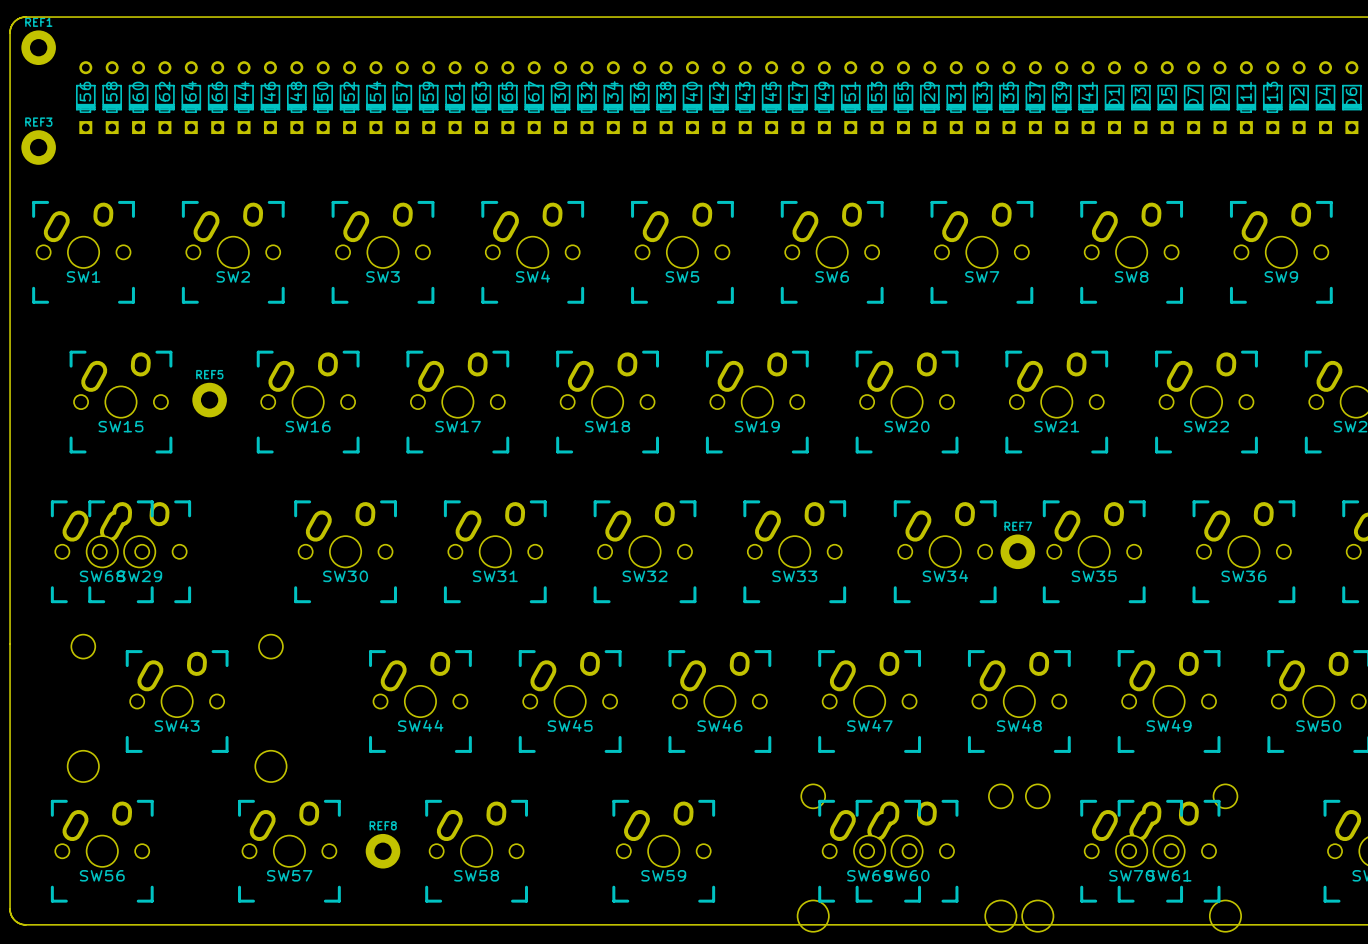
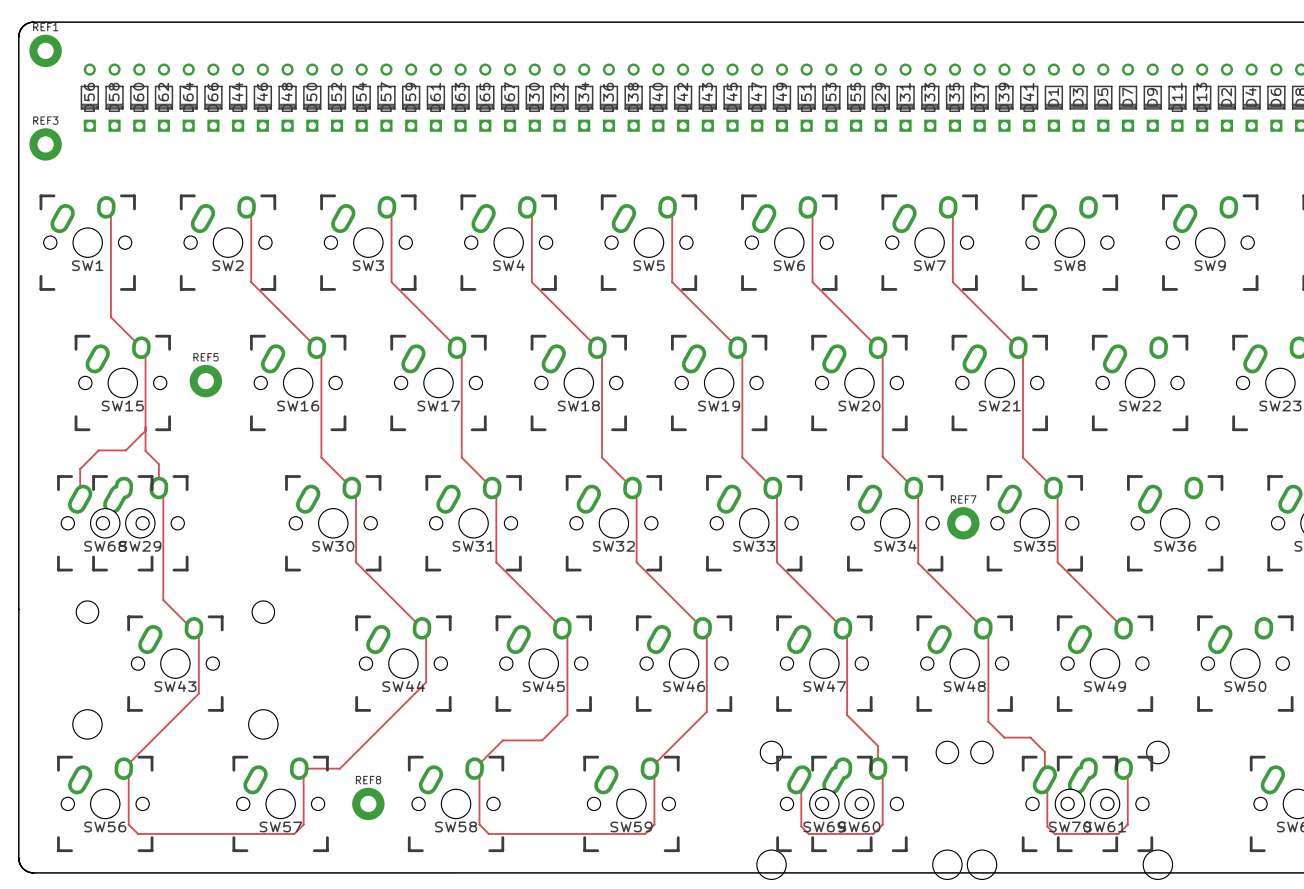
top track: none -> (106, 207) (110, 212) (110, 317) (145, 351) (145, 450) (158, 464) (158, 488) (163, 492) (163, 600) (198, 633) (198, 693) (123, 768) (128, 773) (128, 824) (138, 833) (294, 833) (303, 824) (303, 773) (299, 768) (339, 768) (426, 682) (426, 632) (356, 562) (356, 492) (321, 457) (321, 352) (251, 282) (251, 212) (246, 207)
top track: none -> (386, 207) (391, 212) (391, 282) (461, 352) (461, 457) (496, 492) (496, 562) (567, 633) (567, 715) (542, 740) (502, 740) (474, 768) (479, 773) (479, 824) (488, 833) (645, 833) (654, 824) (654, 773) (650, 768) (706, 711) (706, 632) (636, 562) (636, 492) (602, 457) (602, 352) (531, 282) (531, 212) (527, 207)
top track: none -> (667, 207) (672, 212) (672, 282) (742, 352) (742, 457) (776, 492) (776, 562) (847, 632) (847, 715) (878, 746) (878, 768) (882, 773) (882, 824) (873, 833) (808, 833) (801, 826) (801, 781) (799, 779)
top track: none -> (807, 207) (812, 212) (812, 282) (882, 352) (882, 456) (918, 492) (918, 563) (988, 633) (988, 721) (1004, 737) (1030, 737) (1044, 751) (1047, 826) (1054, 833) (1118, 833) (1127, 824) (1127, 772) (1123, 768)
top track: none -> (948, 207) (952, 212) (952, 282) (1022, 352) (1022, 457) (1057, 492) (1057, 562) (1123, 628)
top track: none -> (145, 430) (125, 450) (98, 450) (80, 469) (80, 499)

